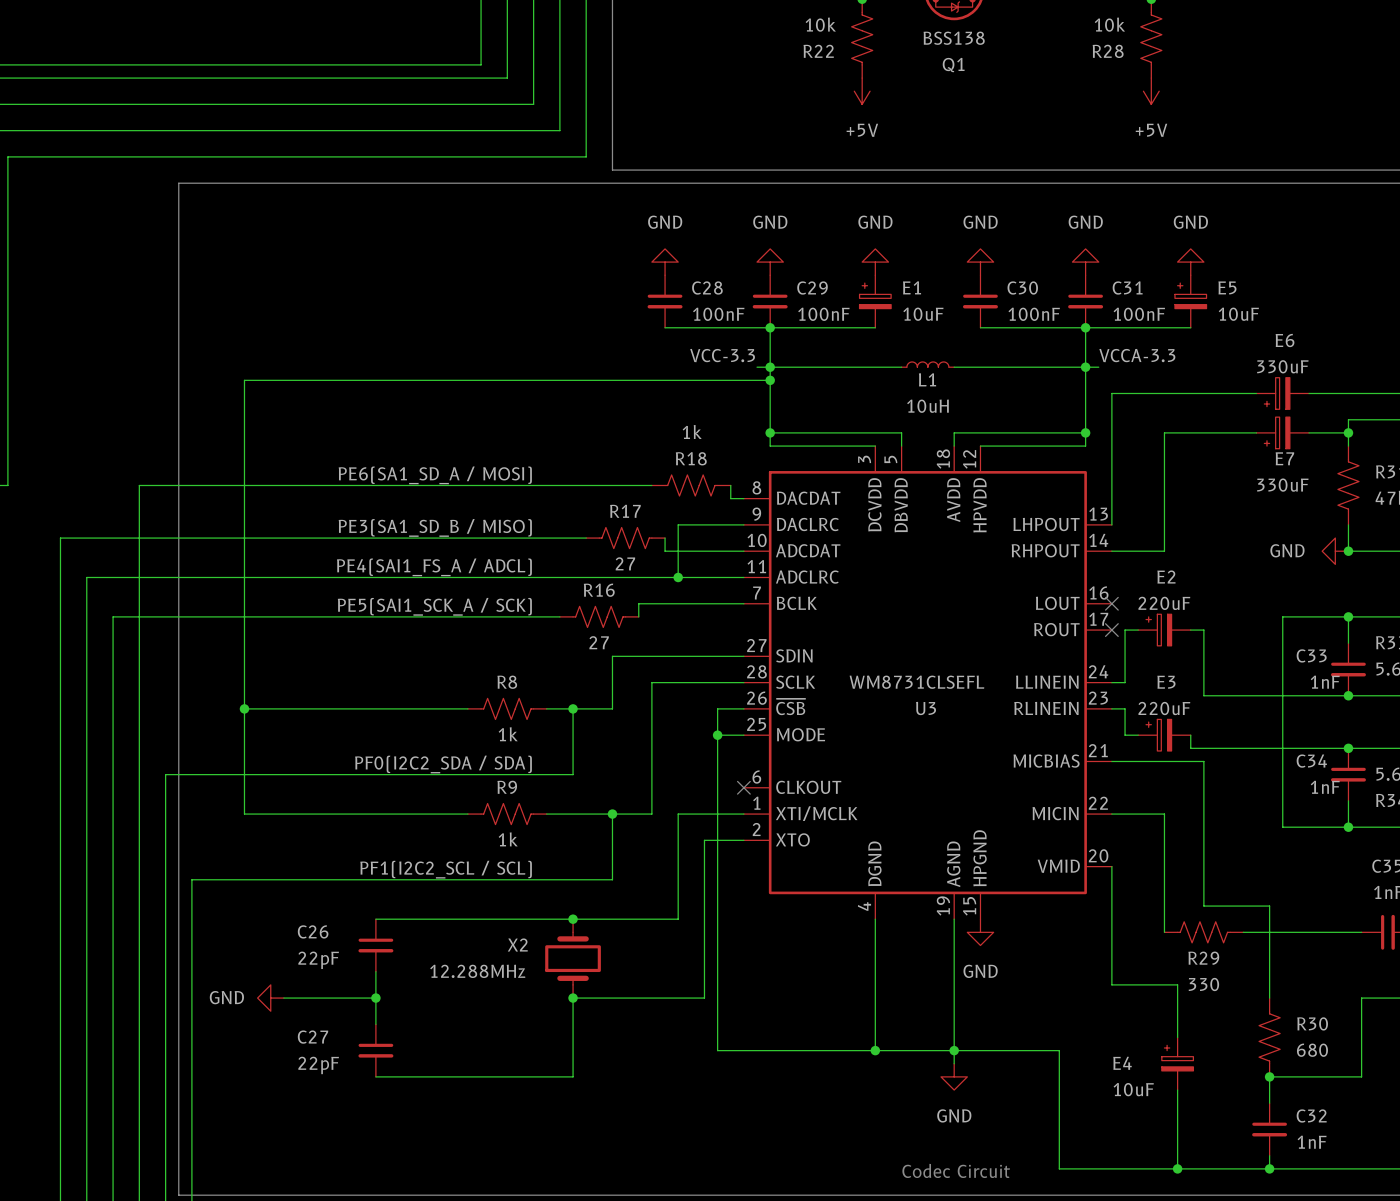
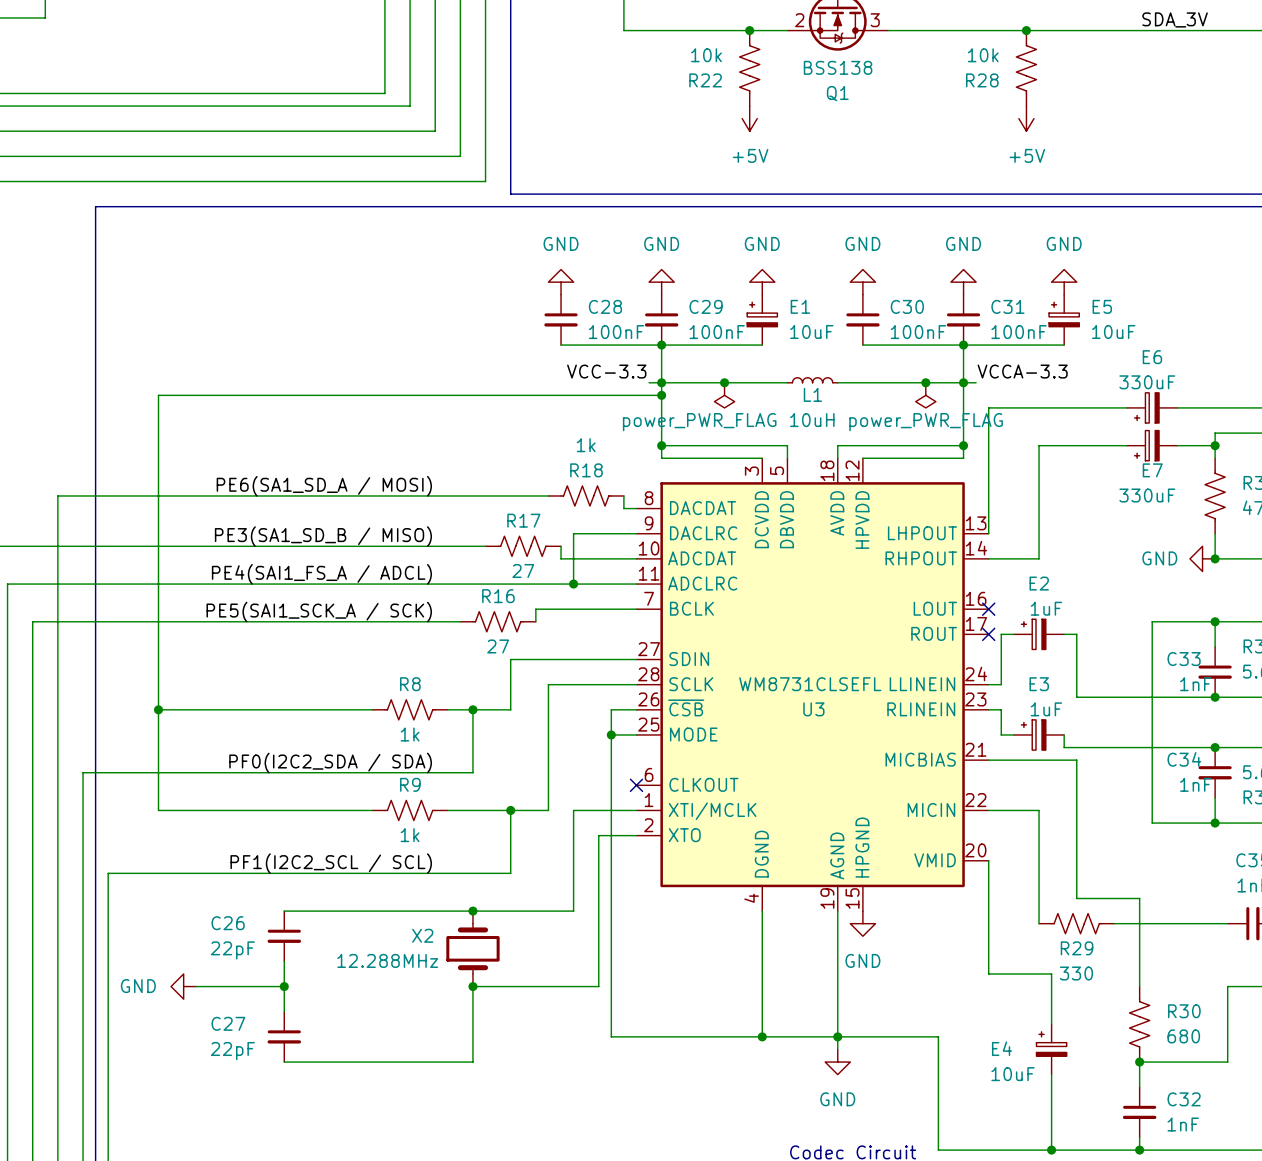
junction: none -> (724, 382)
junction: none -> (925, 382)
power symbol: none -> power_PWR_FLAG (724, 395)
power symbol: none -> power_PWR_FLAG (925, 395)
E2 value: 220uF (1164, 603) -> 1uF (1046, 608)
E3 value: 220uF (1164, 708) -> 1uF (1046, 709)

